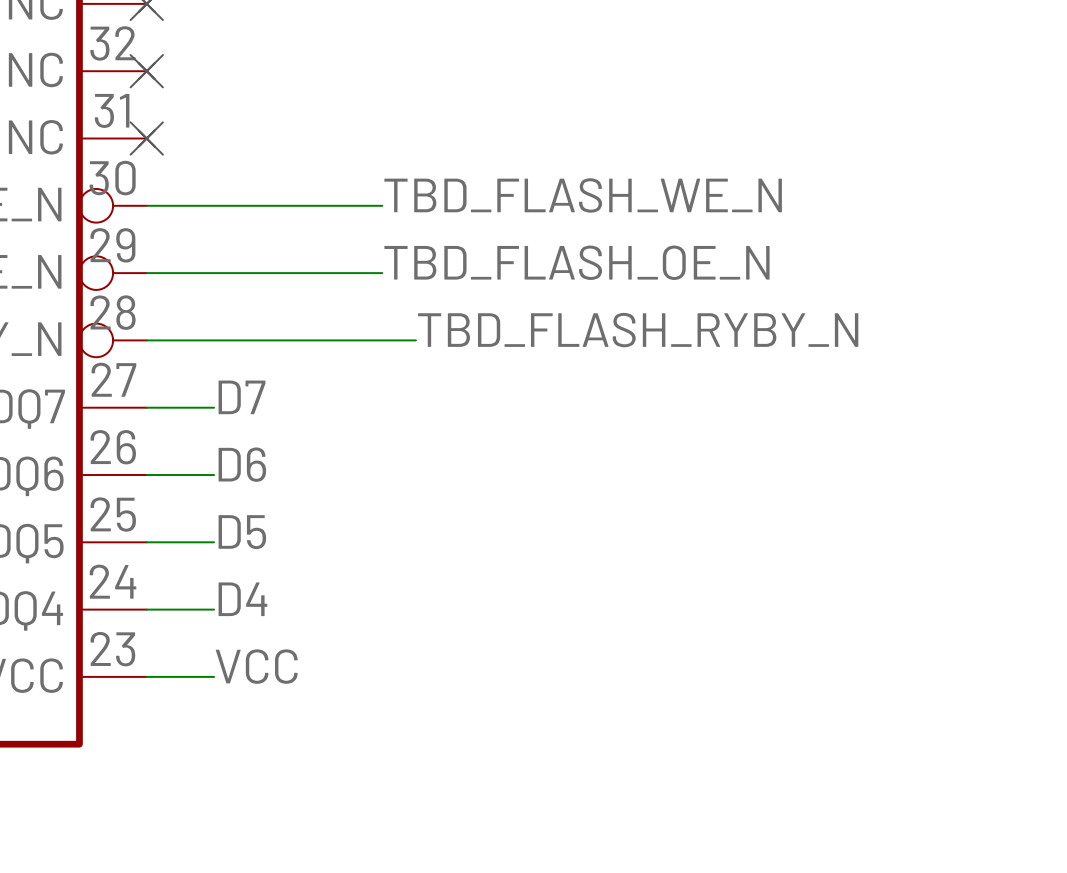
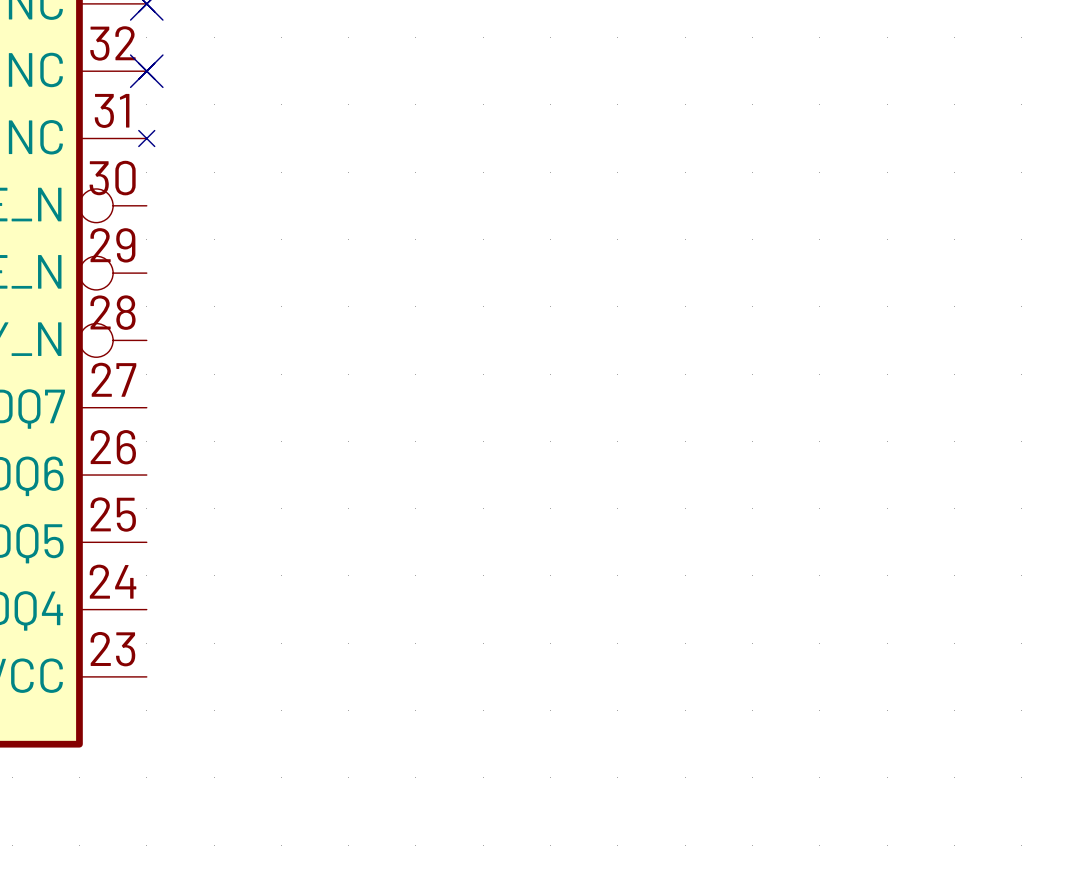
no-connect mark: (146, 138) -> none
label: TBD_FLASH_WE_N (583, 195) -> none
wire: (146, 205) (382, 205) -> none
label: TBD_FLASH_OE_N (576, 262) -> none
wire: (146, 273) (382, 273) -> none
label: TBD_FLASH_RYBY_N (638, 330) -> none
wire: (146, 340) (415, 340) -> none
label: D7 (242, 397) -> none
wire: (146, 407) (214, 407) -> none
label: D6 (242, 464) -> none
wire: (146, 475) (214, 475) -> none
label: D5 (242, 532) -> none
wire: (146, 542) (214, 542) -> none
label: D4 (242, 599) -> none
wire: (146, 609) (214, 609) -> none
label: VCC (256, 666) -> none
wire: (146, 676) (214, 676) -> none

